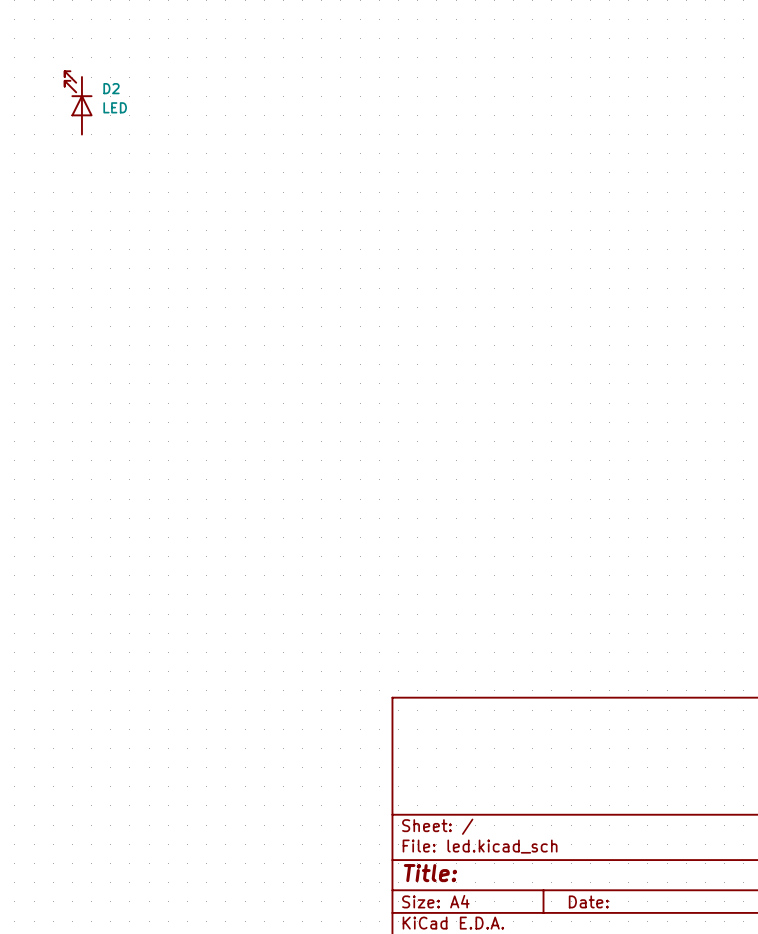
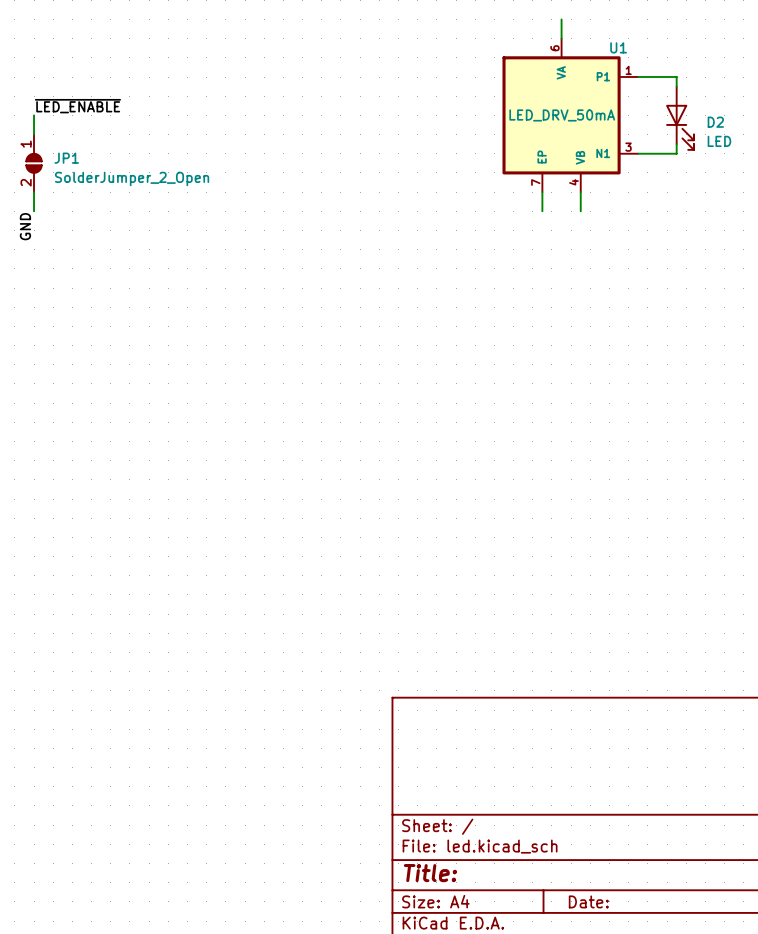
wire: none -> (561, 19) (561, 38)
wire: none -> (638, 77) (676, 77) (676, 86)
D2 name position: D2 (111, 88) -> D2 (715, 122)
D2 rotation: 0° (78, 93) -> 180° (680, 127)
D2 position: (78, 102) -> (680, 118)
label: none -> ~{LED_ENABLE} (77, 106)
D2 value position: LED (115, 107) -> LED (719, 141)
wire: none -> (34, 115) (34, 134)
U1: none -> LED_DRV_50mA (570, 115)
wire: none -> (676, 144) (676, 153) (638, 153)
JP1: none -> SolderJumper_2_Open (34, 163)
wire: none -> (34, 192) (34, 211)
wire: none -> (542, 192) (542, 211)
wire: none -> (580, 192) (580, 211)
label: none -> GND (25, 226)

